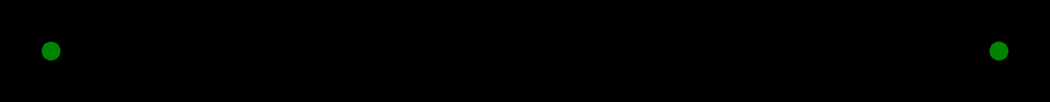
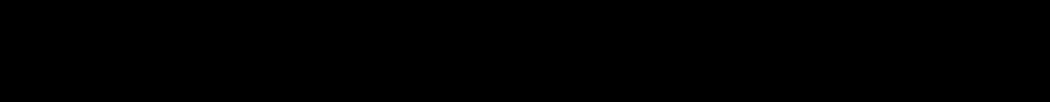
part: (51, 51) -> none
part: (998, 51) -> none

